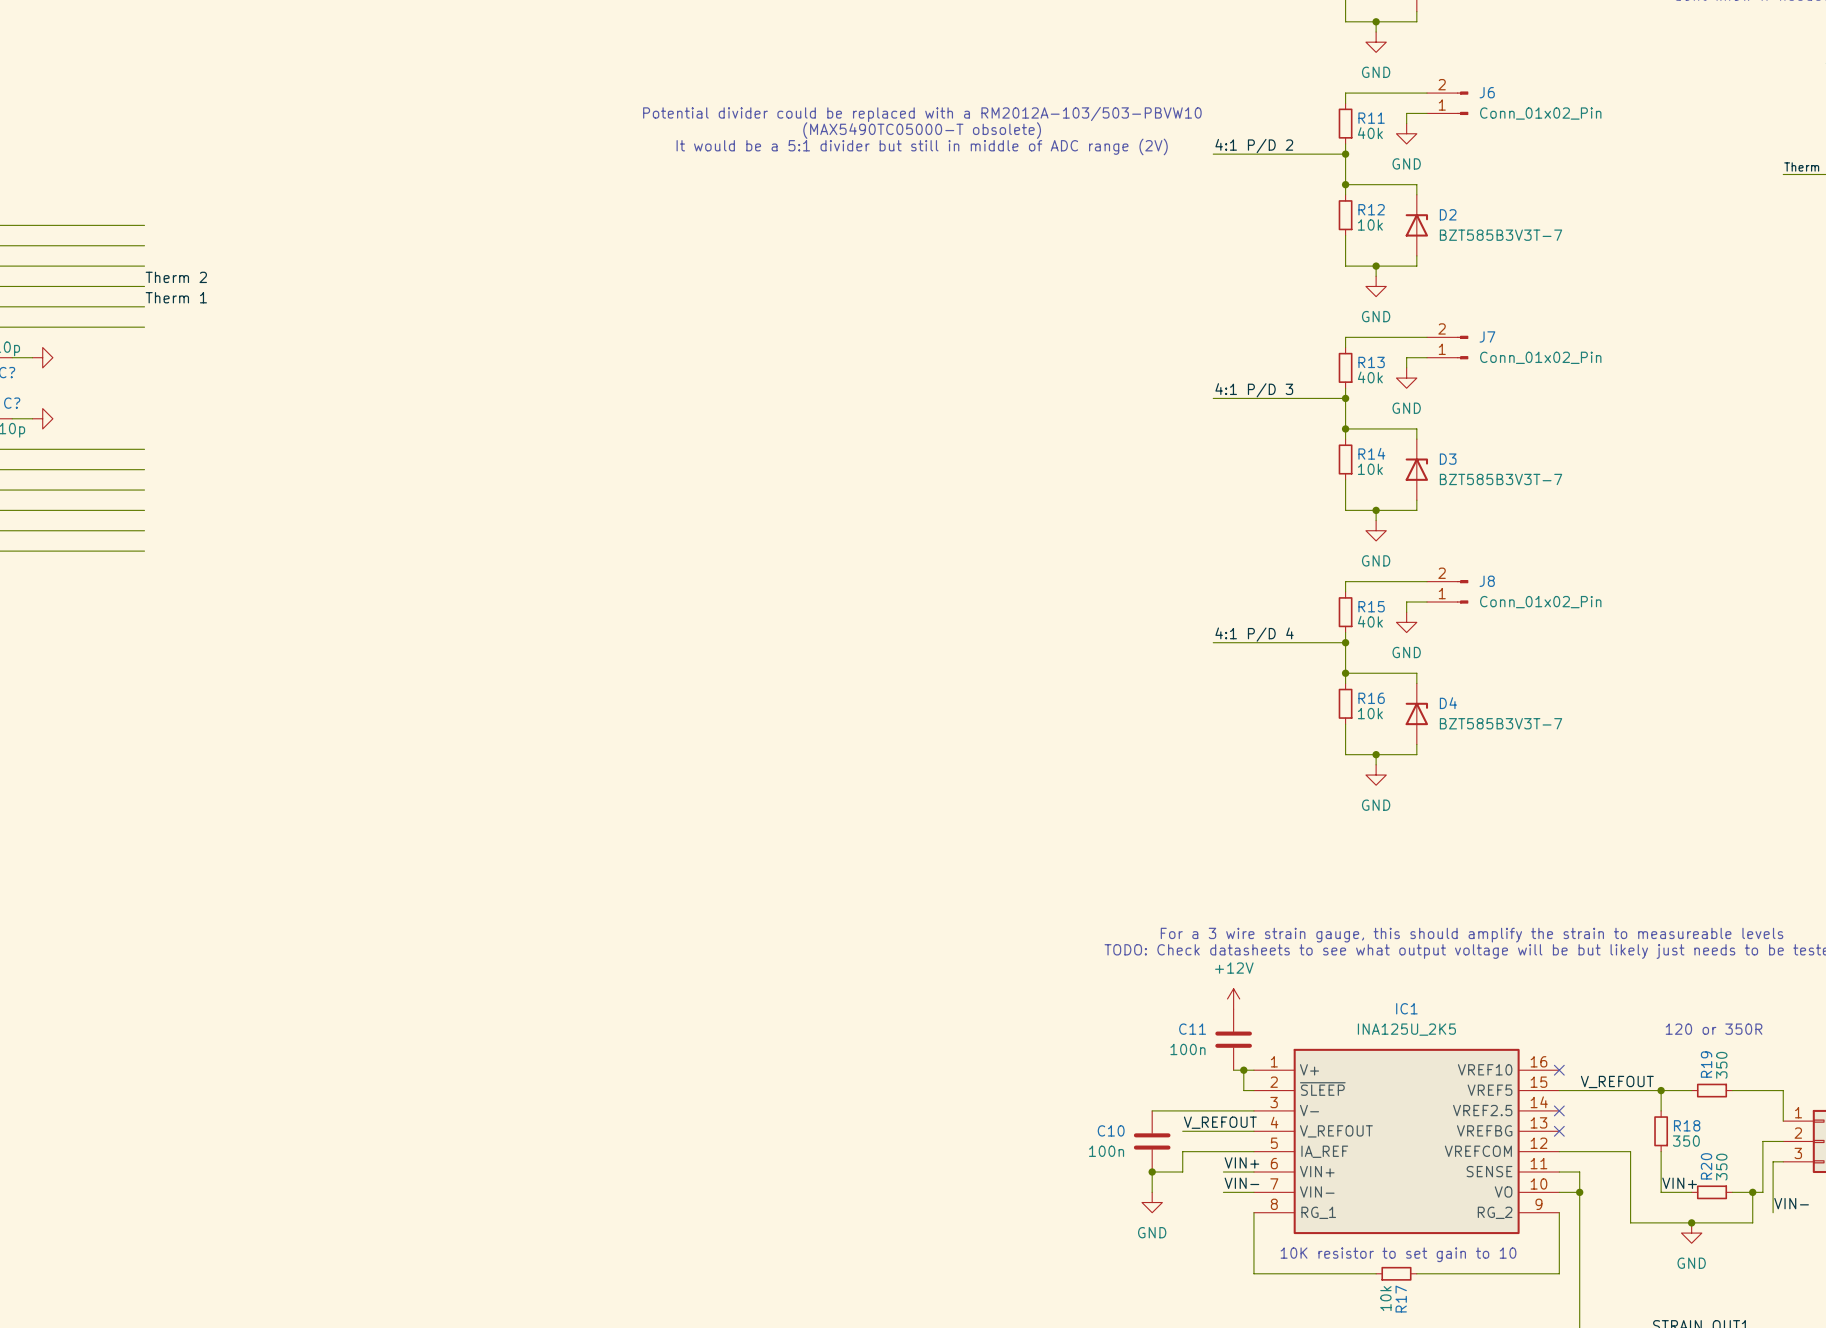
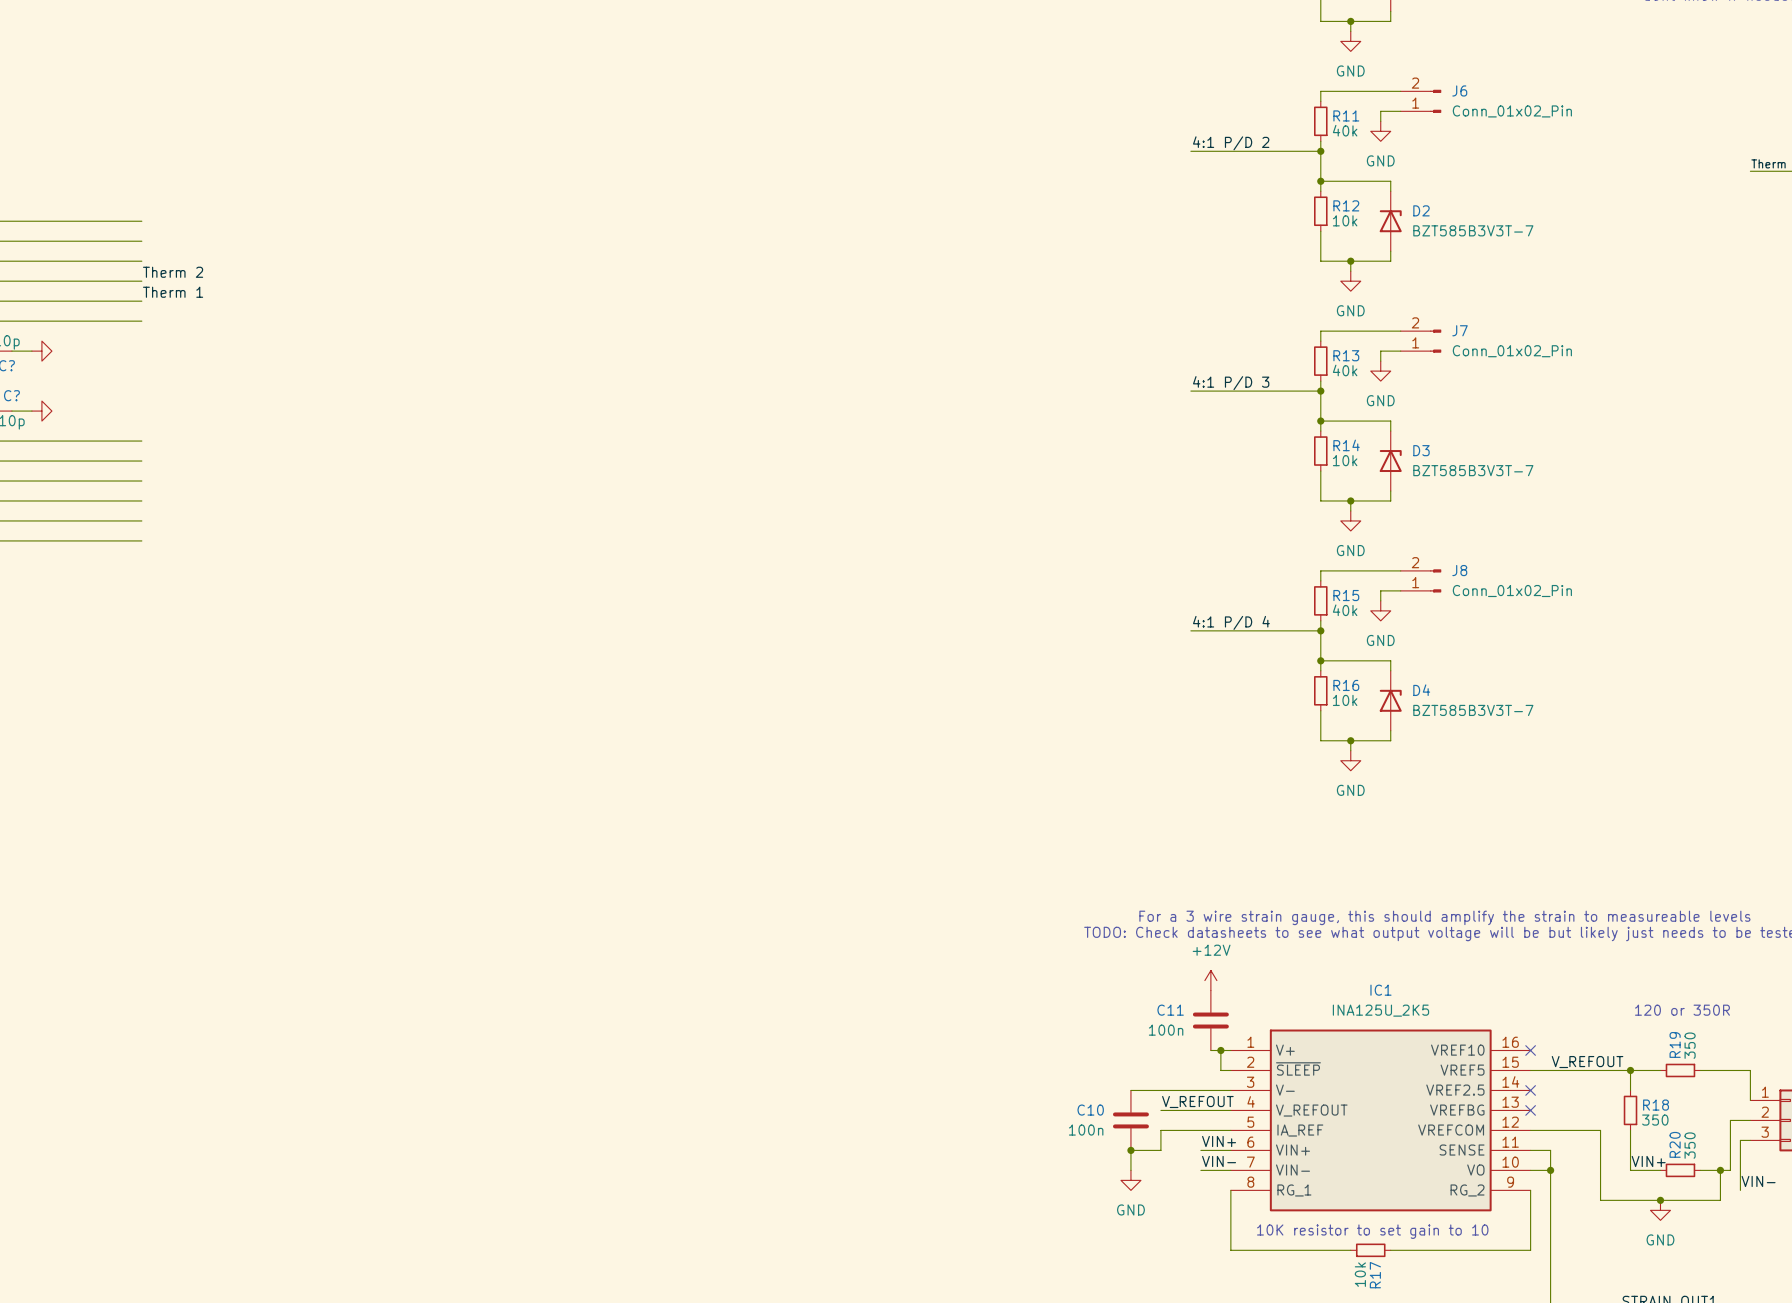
text: Potential divider could be replaced with a RM2012A-103/503-PBVW10 (922, 114) -> none
text: (MAX5490TC05000-T obsolete) (922, 130) -> none
text: It would be a 5:1 divider but still in middle of ADC range (2V) (922, 146) -> none

